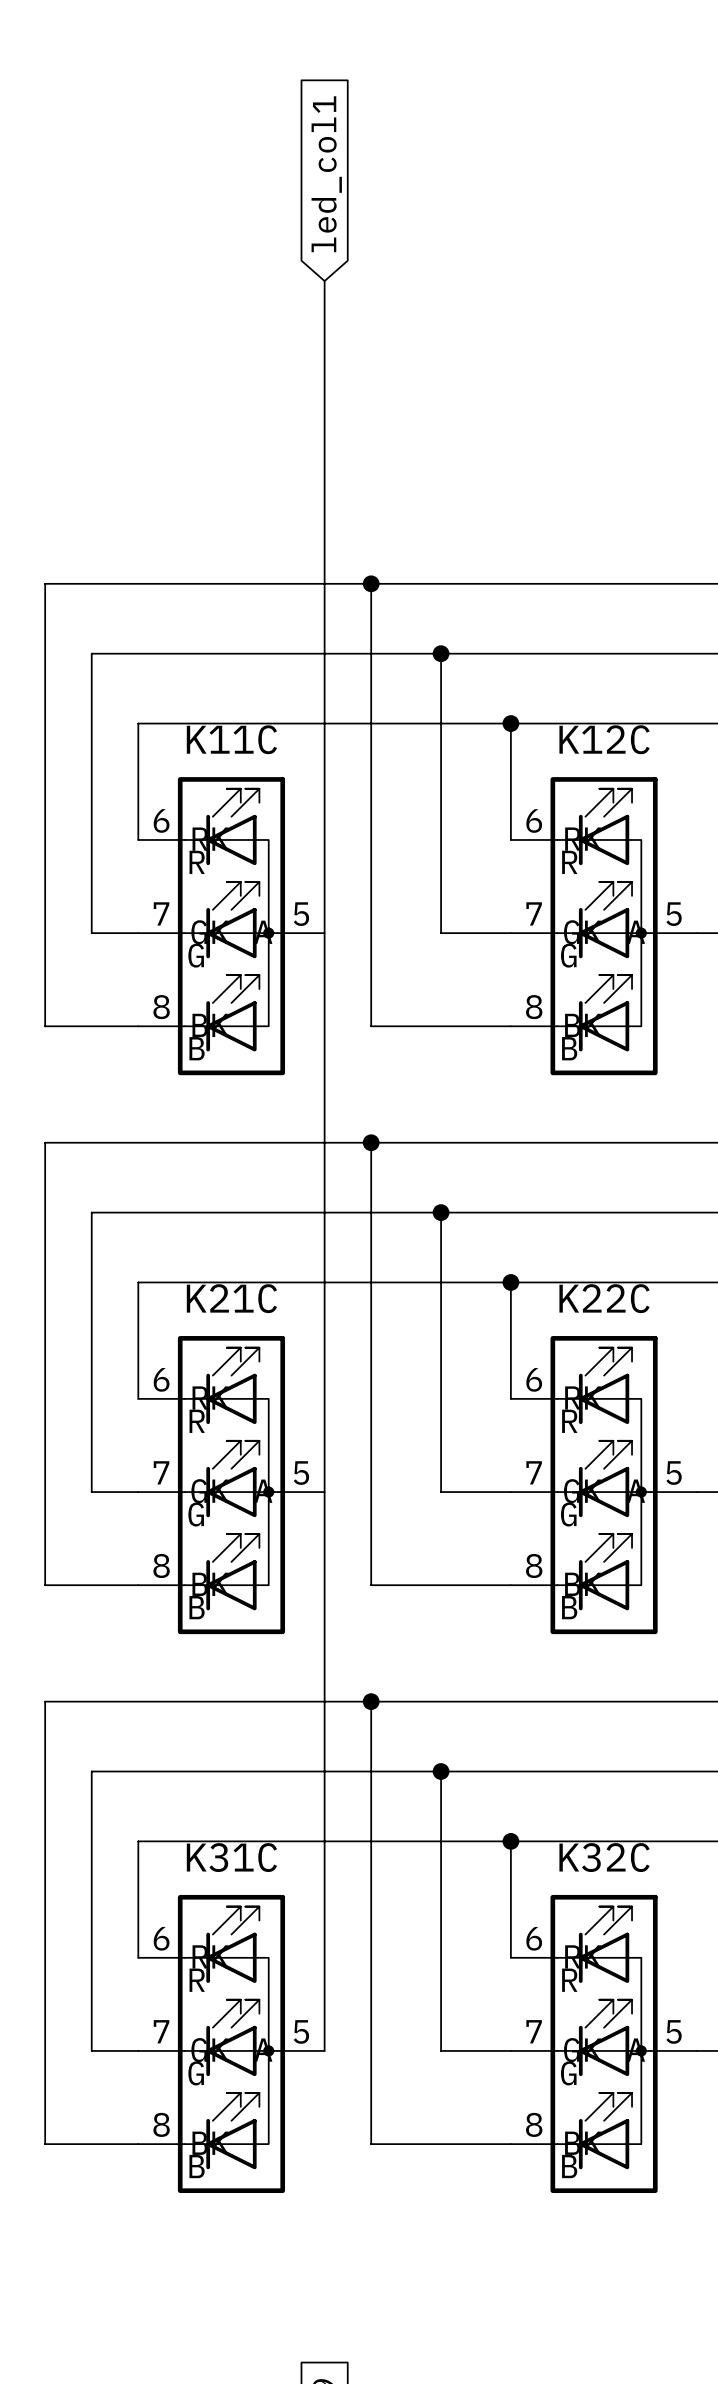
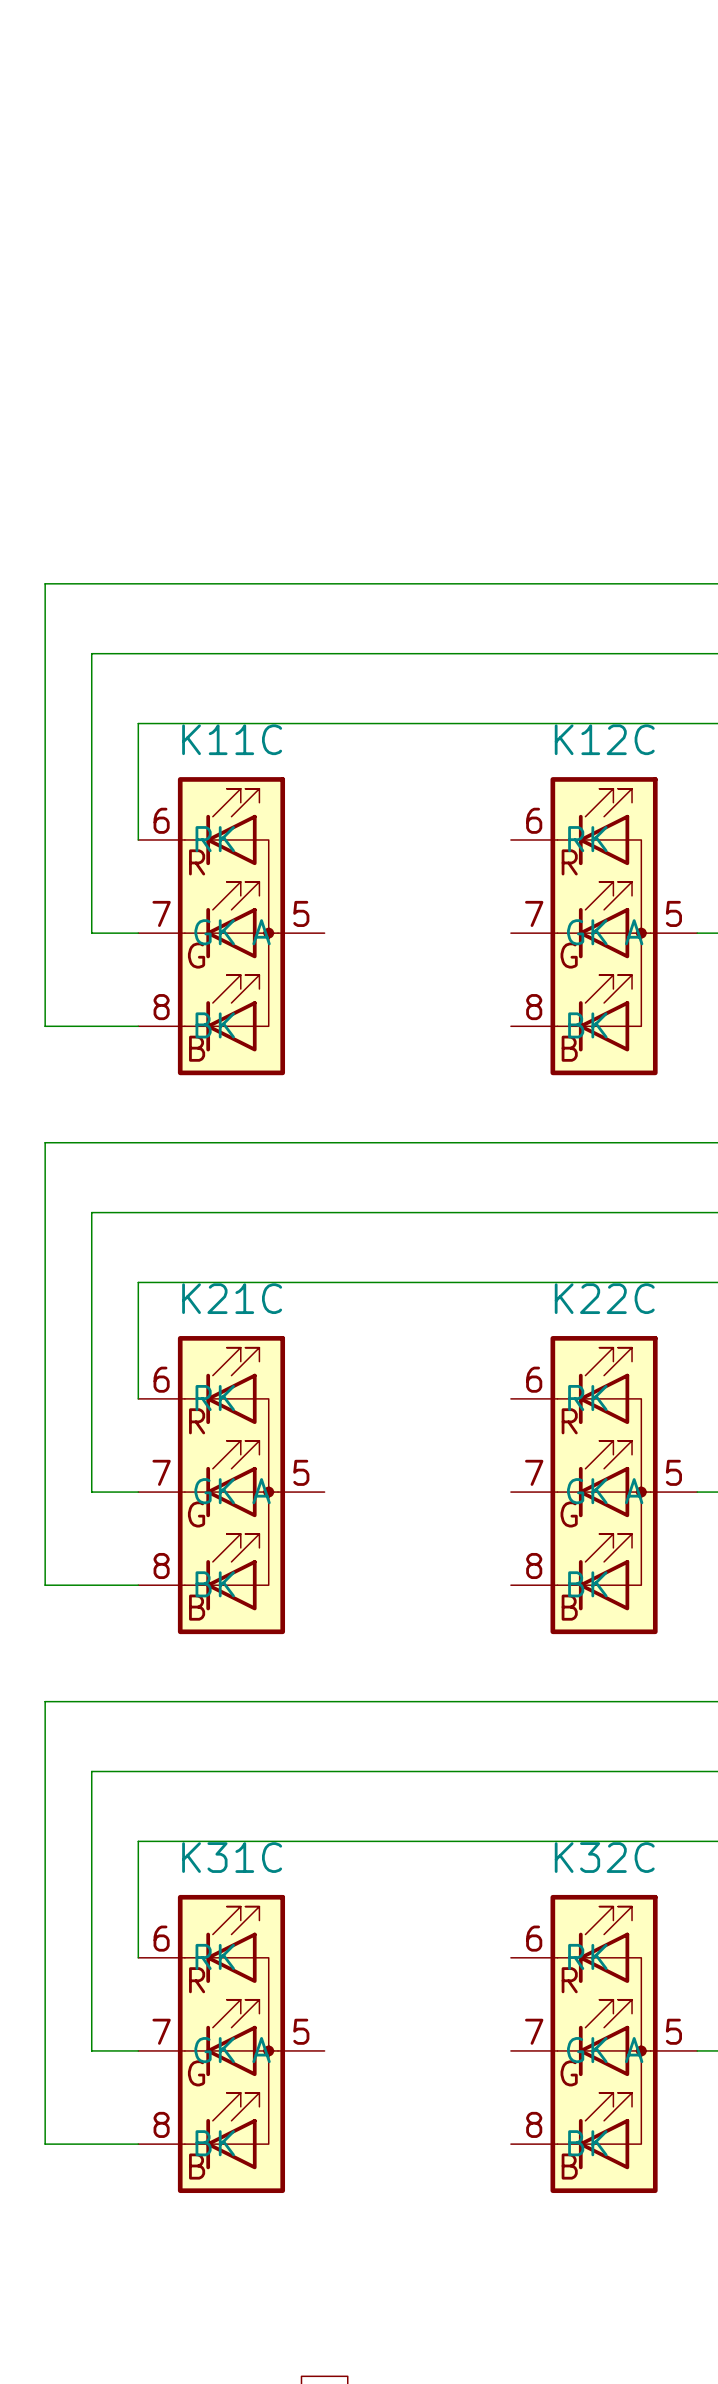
global label: led_col1 (326, 174) -> none
wire: (324, 281) (324, 2050) -> none
wire: (371, 583) (371, 1026) (510, 1026) -> none
junction: (371, 583) -> none
wire: (441, 653) (441, 933) (510, 933) -> none
junction: (441, 653) -> none
wire: (510, 723) (510, 839) -> none
junction: (510, 723) -> none
wire: (371, 1142) (371, 1585) (510, 1585) -> none
junction: (371, 1142) -> none
wire: (441, 1212) (441, 1492) (510, 1492) -> none
junction: (441, 1212) -> none
wire: (510, 1282) (510, 1398) -> none
junction: (510, 1282) -> none
wire: (371, 1701) (371, 2144) (510, 2144) -> none
junction: (371, 1701) -> none
wire: (441, 1771) (441, 2050) (510, 2050) -> none
junction: (441, 1771) -> none
wire: (510, 1841) (510, 1957) -> none
junction: (510, 1841) -> none

